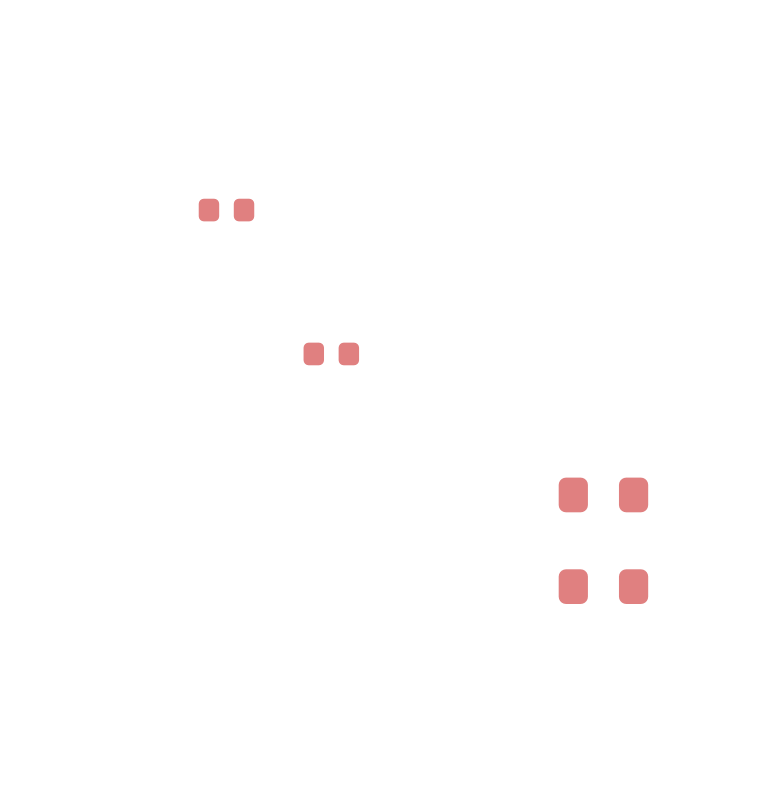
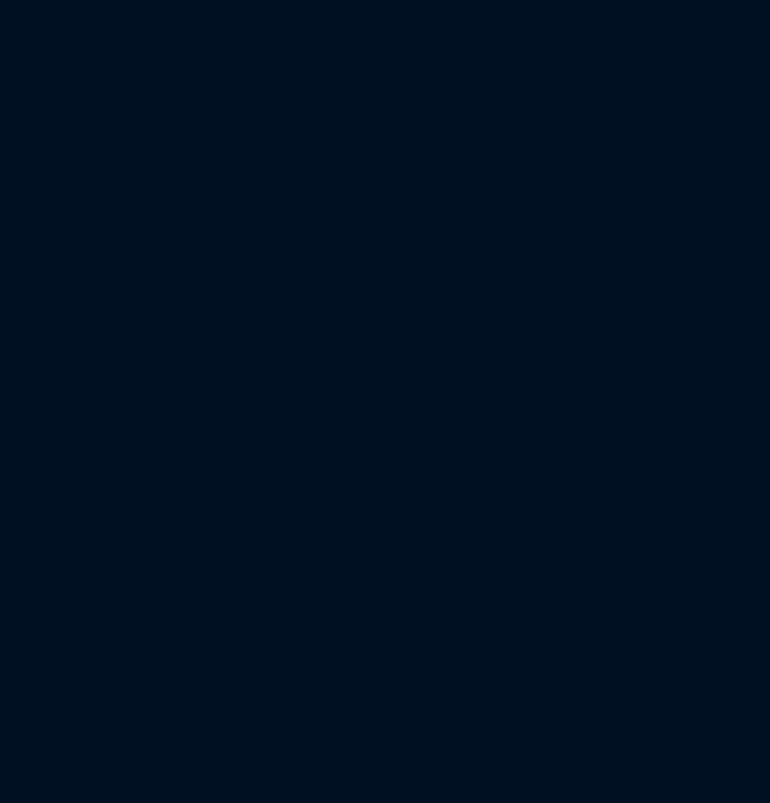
part: (226, 210) -> none
part: (331, 353) -> none
part: (603, 494) -> none
part: (603, 586) -> none

